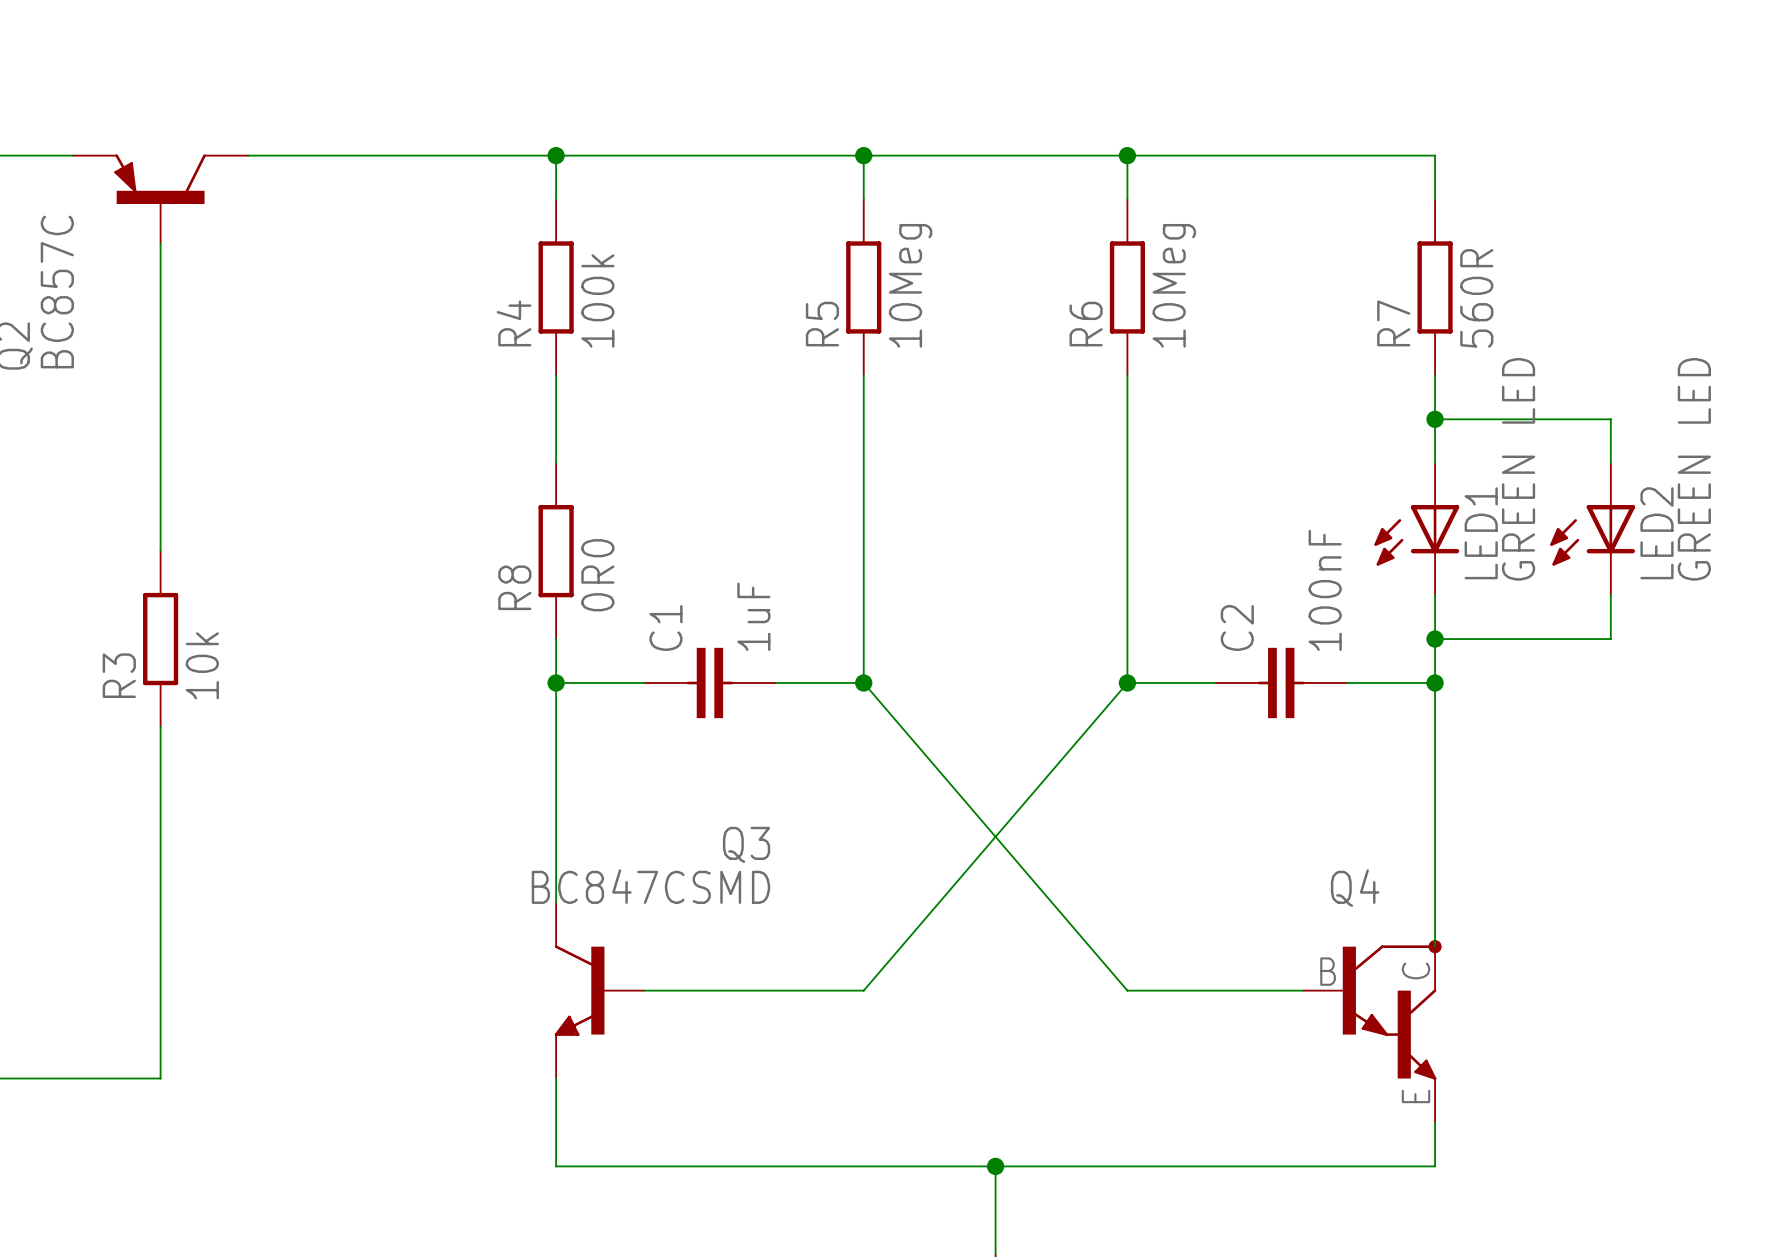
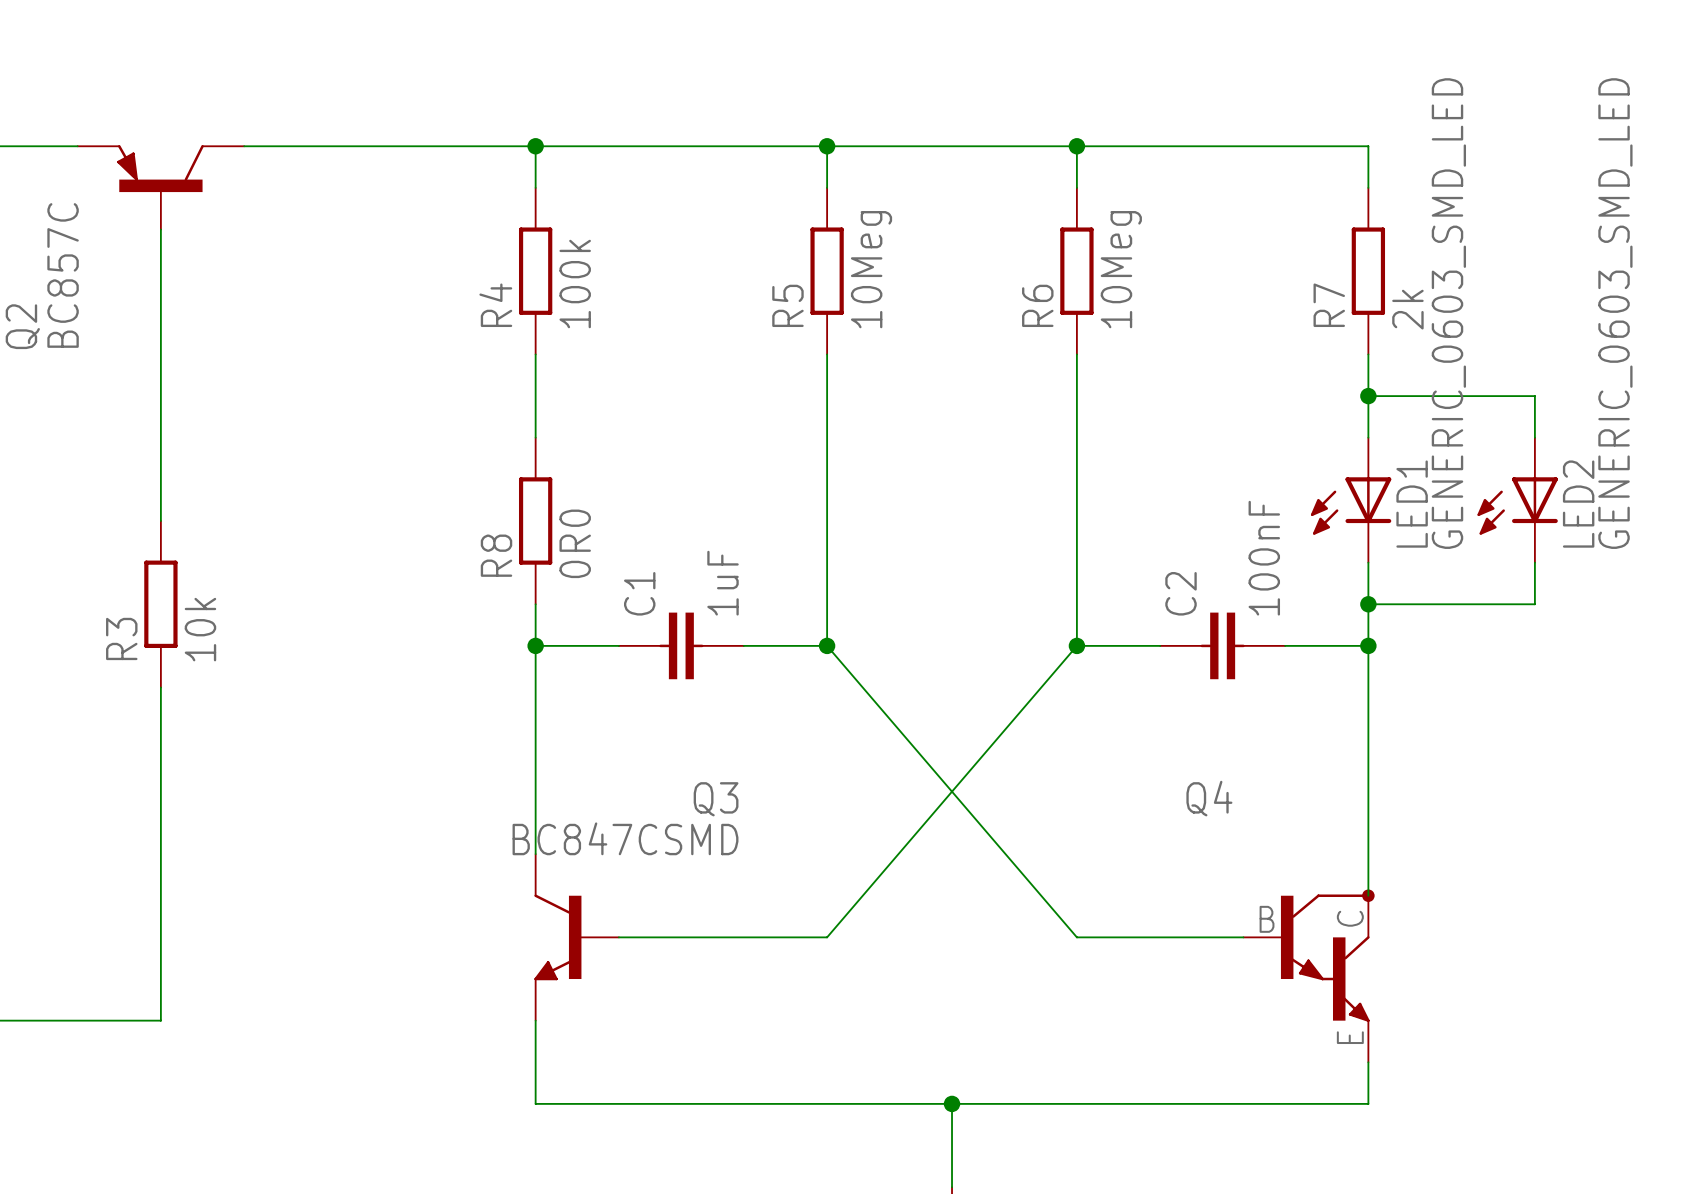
R7 value: 560R (1476, 298) -> 2k (1407, 309)
LED1 value: GREEN LED (1518, 469) -> GENERIC_0603_SMD_LED (1448, 313)
LED2 value: GREEN LED (1694, 469) -> GENERIC_0603_SMD_LED (1615, 313)
Q4 name position: Q4 (1355, 888) -> Q4 (1209, 798)

